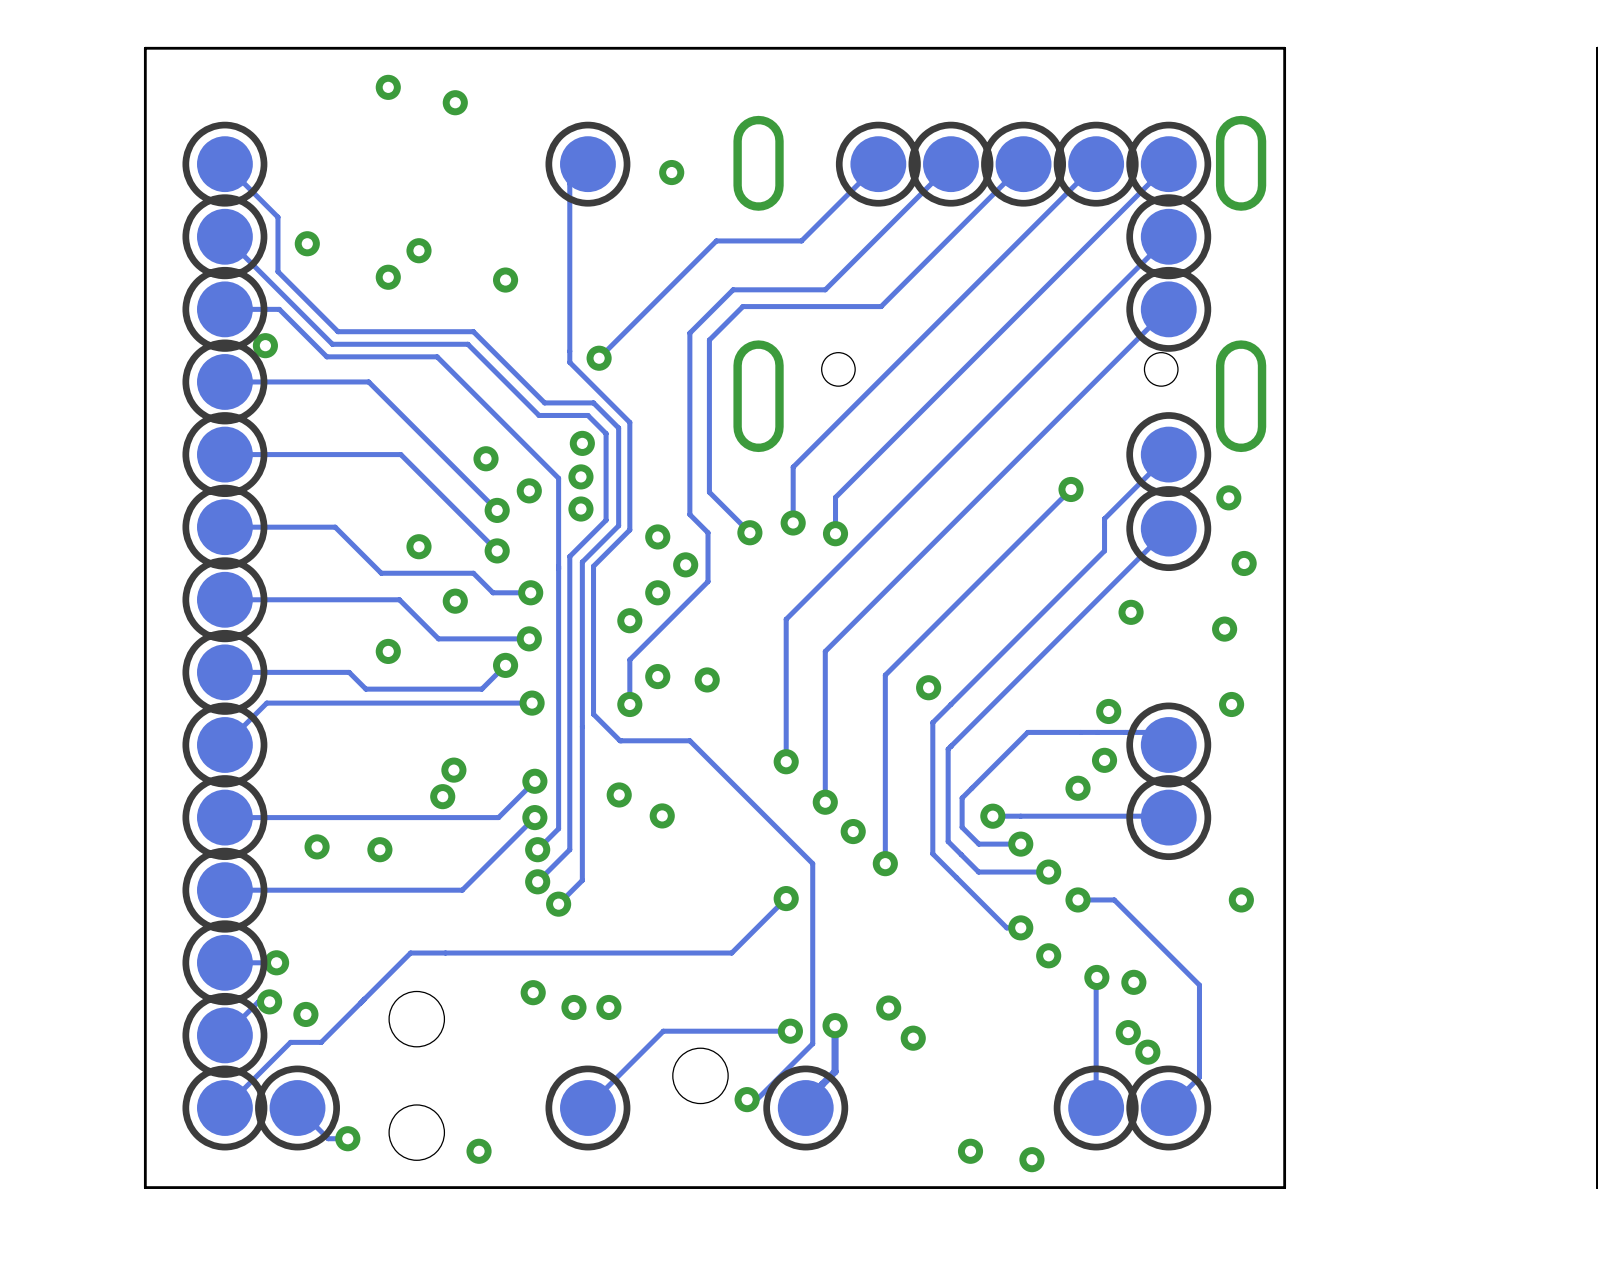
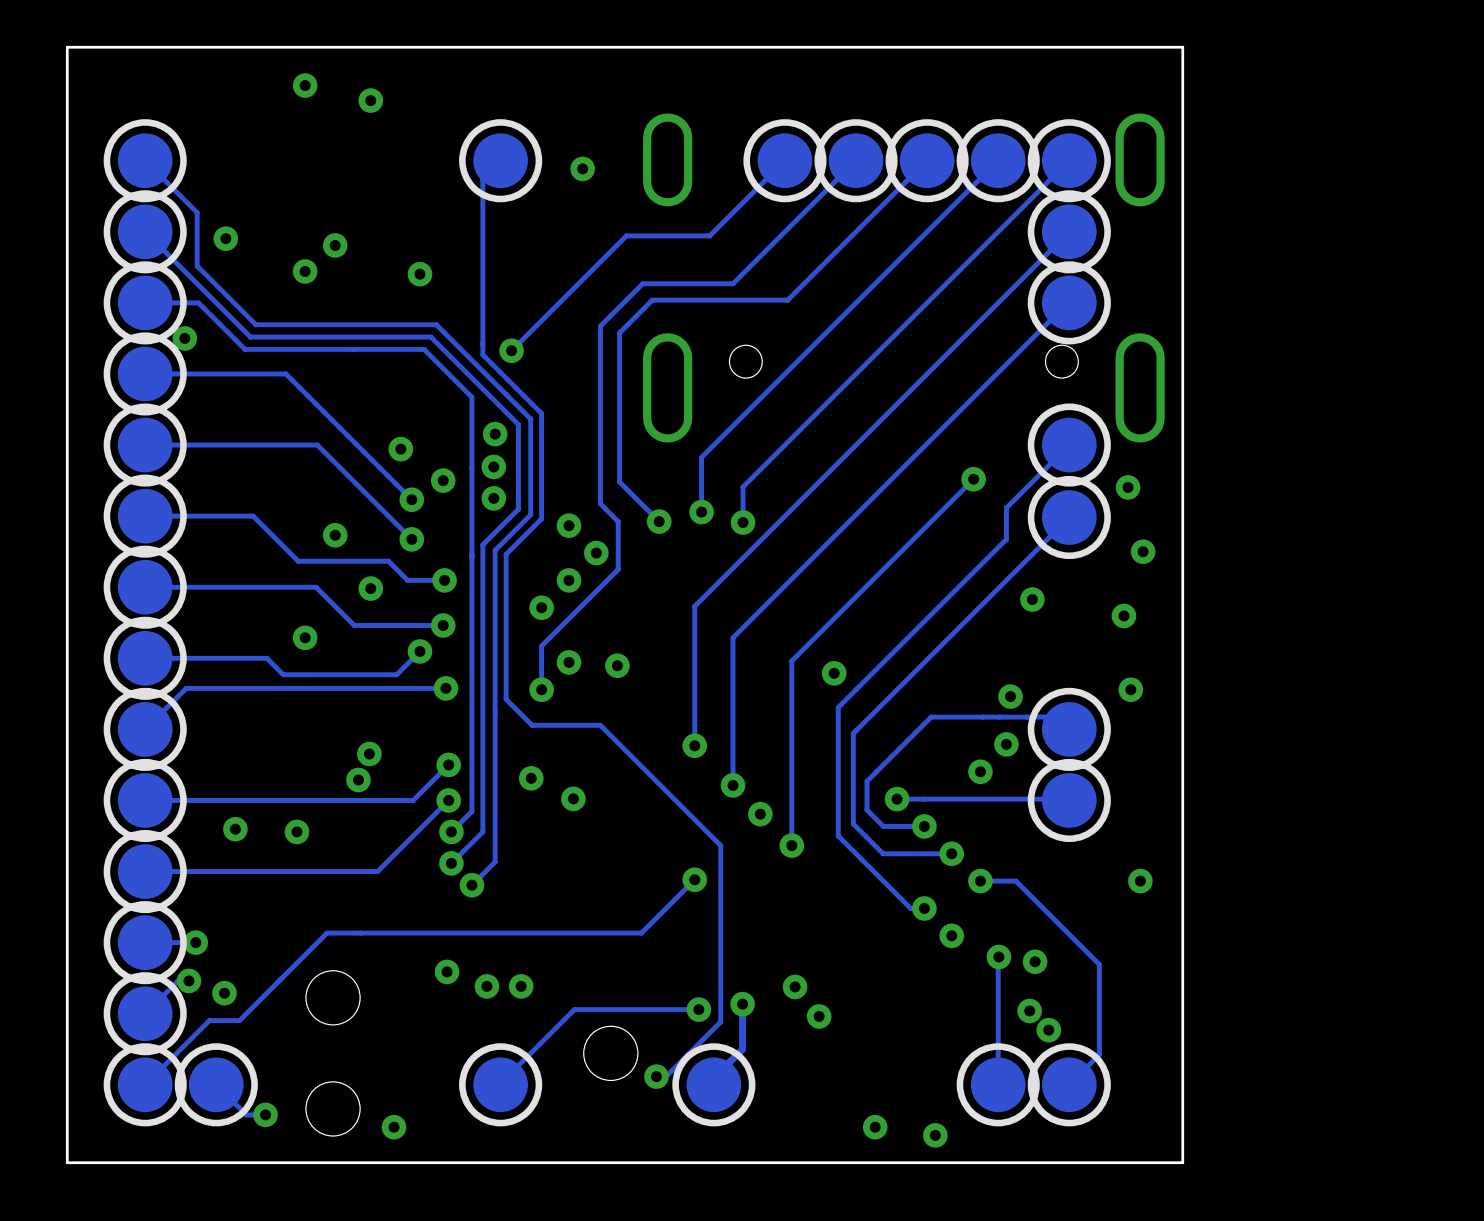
track: (473, 331) (544, 402) (593, 402) -> (388, 324) (436, 324) (506, 394)
track: (467, 344) (539, 415) (587, 415) -> (383, 337) (430, 337) (500, 406)
track: (437, 356) (558, 478) -> (352, 349) (424, 349) (471, 397) (471, 468)

